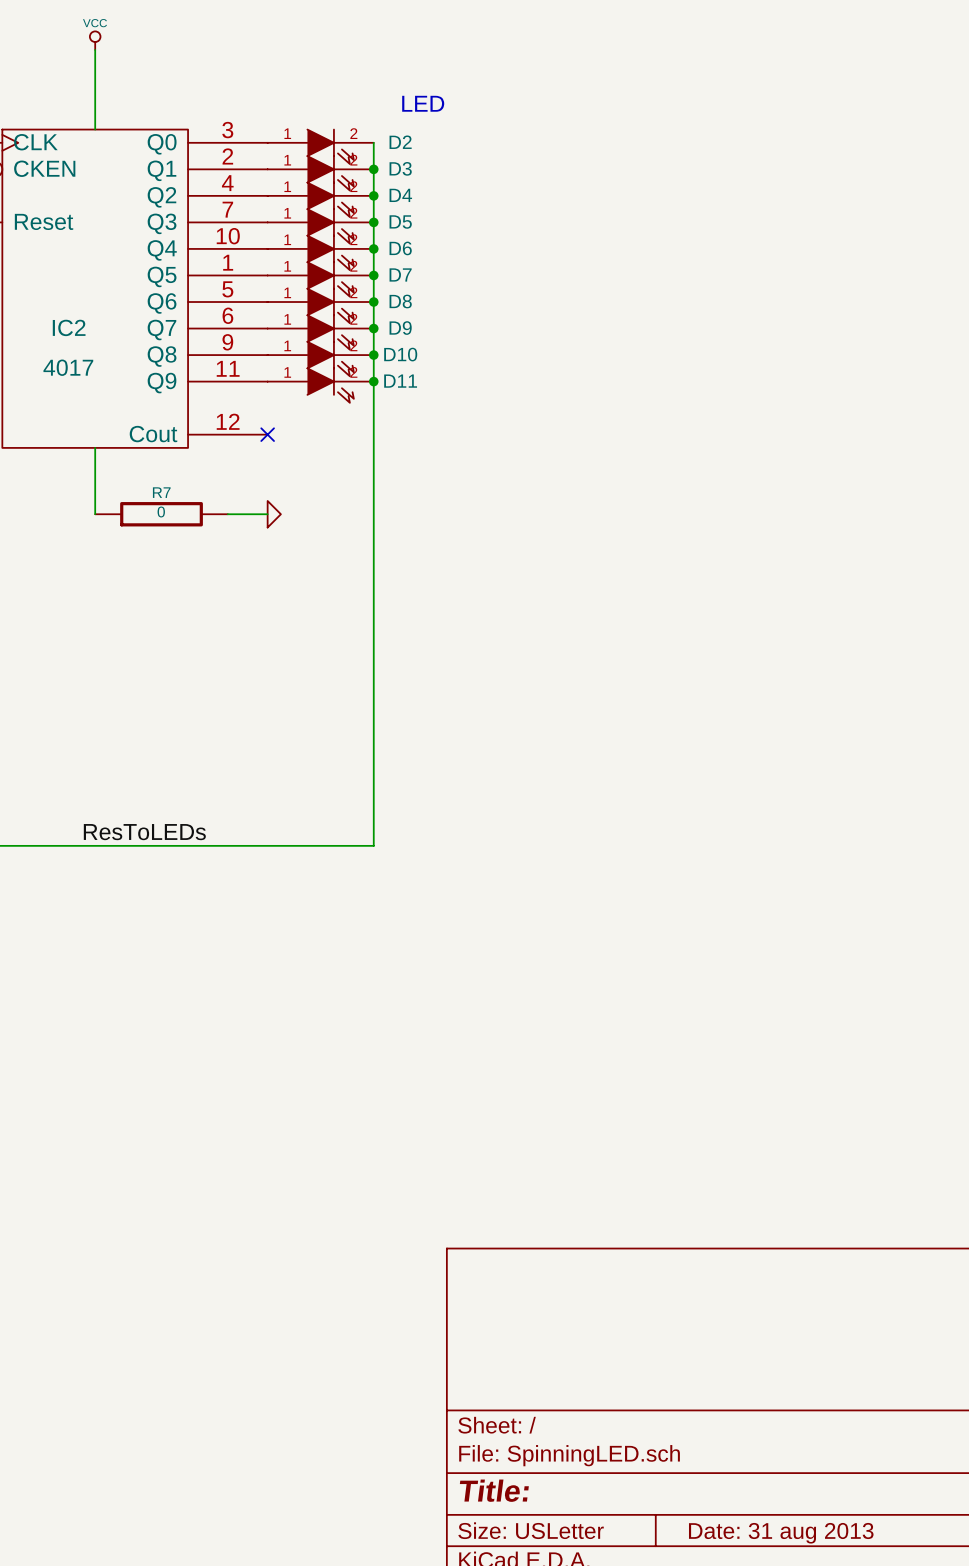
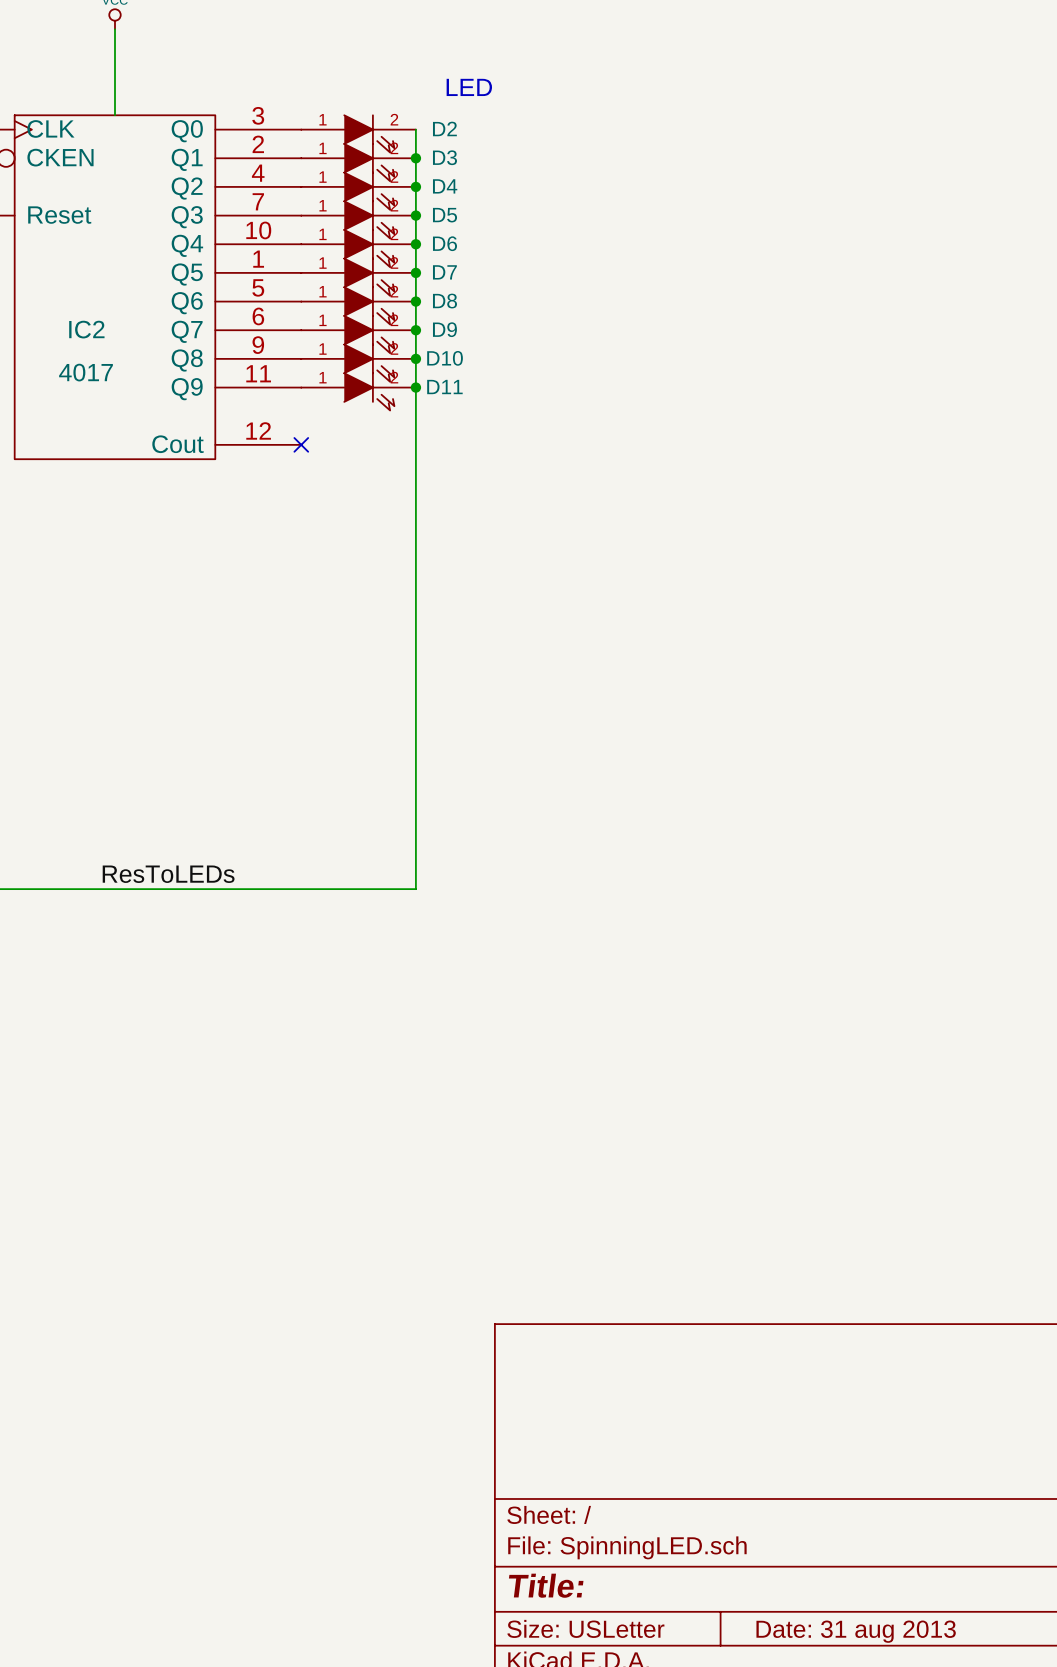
wire: (95, 447) (95, 514) -> none
R7: 0 (161, 514) -> none
wire: (227, 514) (267, 514) -> none
power symbol: (274, 514) -> none

